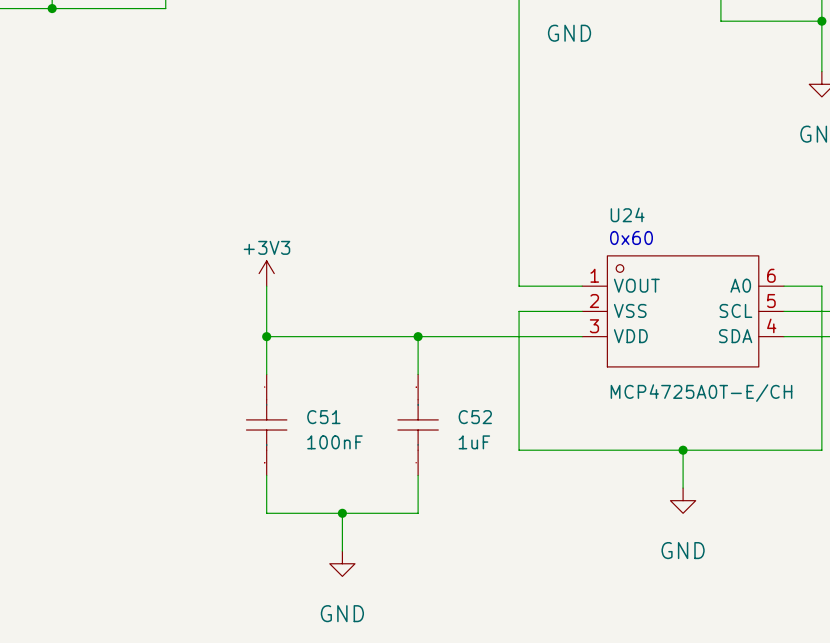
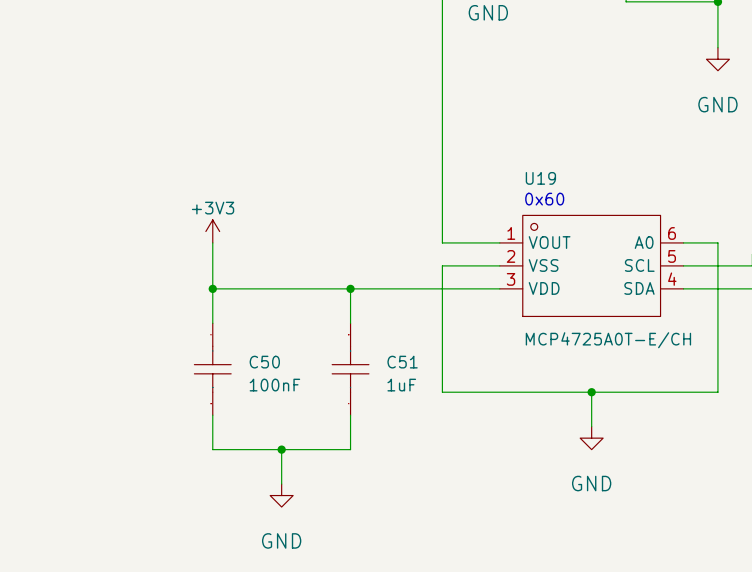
U24 name: U24 (627, 214) -> U19 (540, 178)
C51 name: C51 (323, 417) -> C50 (264, 362)
C52 name: C52 (475, 417) -> C51 (402, 362)

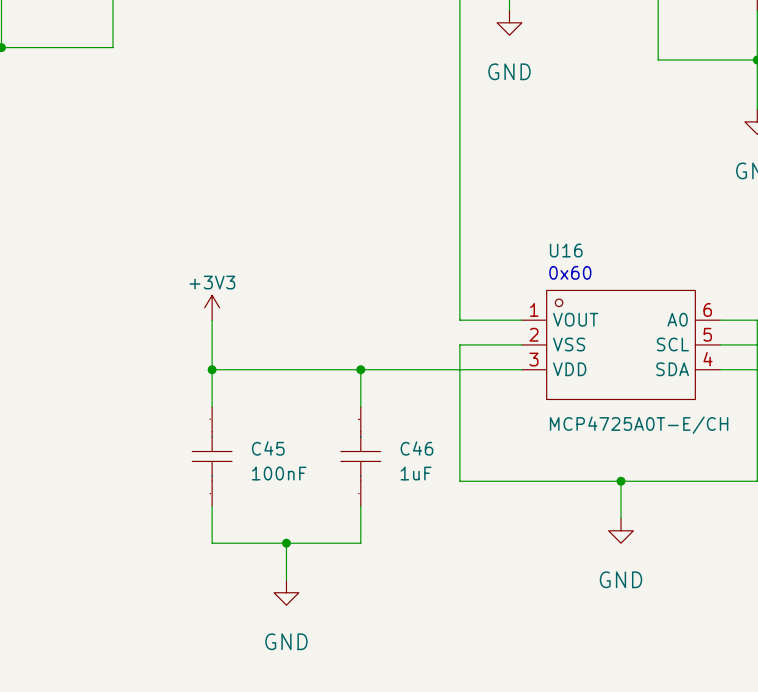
U19 name: U19 (540, 178) -> U16 (566, 250)
C50 name: C50 (264, 362) -> C45 (268, 448)
C51 name: C51 (402, 362) -> C46 (416, 448)

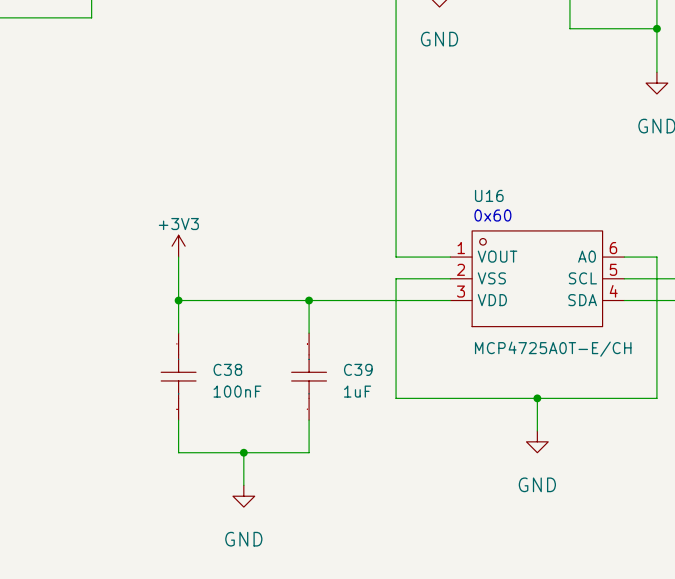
C45 name: C45 (268, 448) -> C38 (227, 369)
C46 name: C46 (416, 448) -> C39 (358, 369)

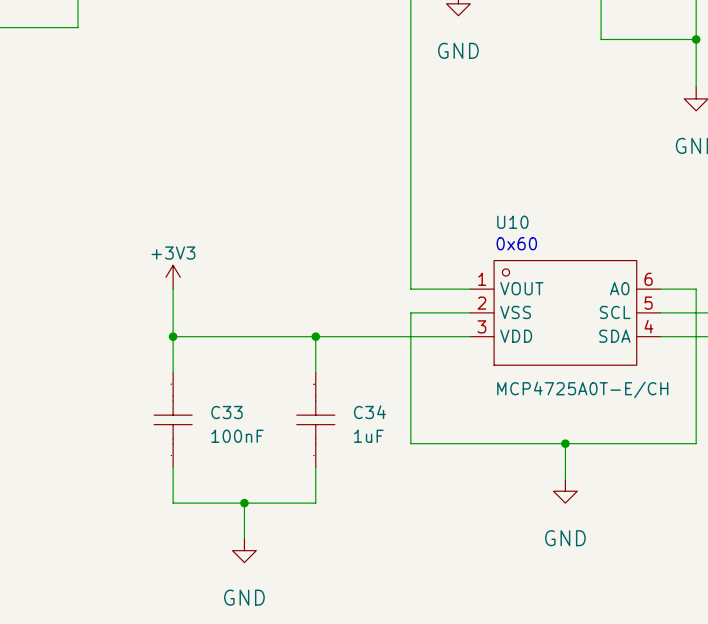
U16 name: U16 (489, 195) -> U10 (512, 222)
C38 name: C38 (227, 369) -> C33 (226, 412)
C39 name: C39 (358, 369) -> C34 (369, 412)

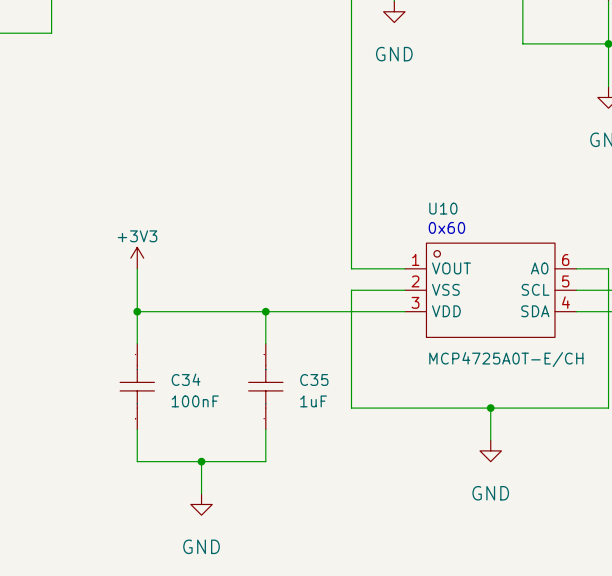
C33 name: C33 (226, 412) -> C34 (186, 379)
C34 name: C34 (369, 412) -> C35 (314, 379)

